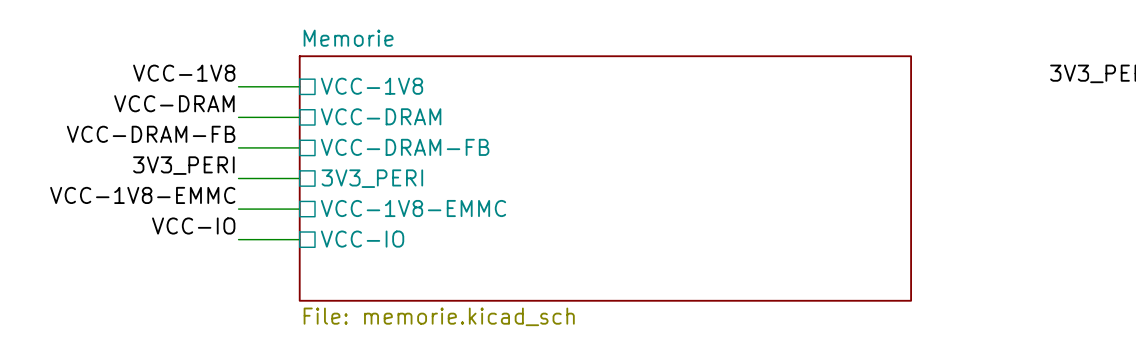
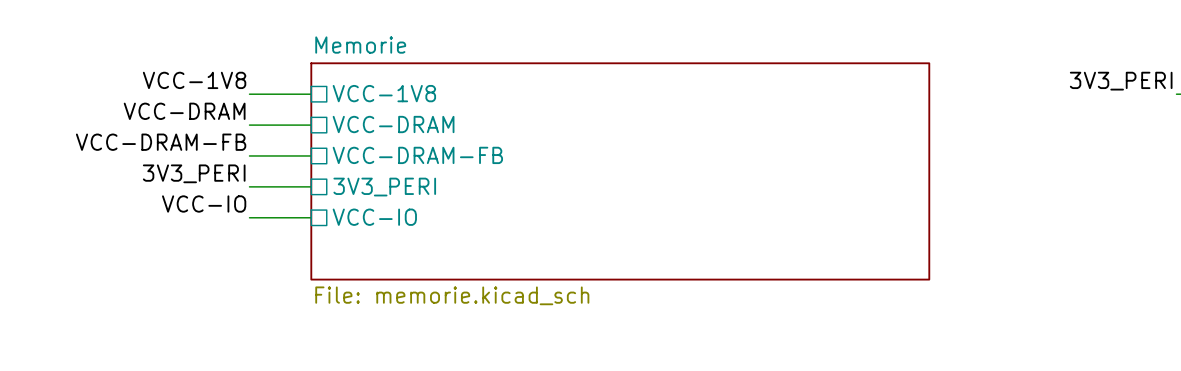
sheet Memorie: none -> File: memorie.kicad_sch (620, 171)
sheet Memorie: File: memorie.kicad_sch (605, 178) -> none
label: VCC-1V8-EMMC (142, 195) -> VCC-IO (204, 204)
sheet pin: VCC-1V8-EMMC (413, 208) -> VCC-IO (374, 217)
label: VCC-IO (193, 226) -> none
wire: (238, 239) (299, 239) -> none
sheet pin: VCC-IO (362, 239) -> none

